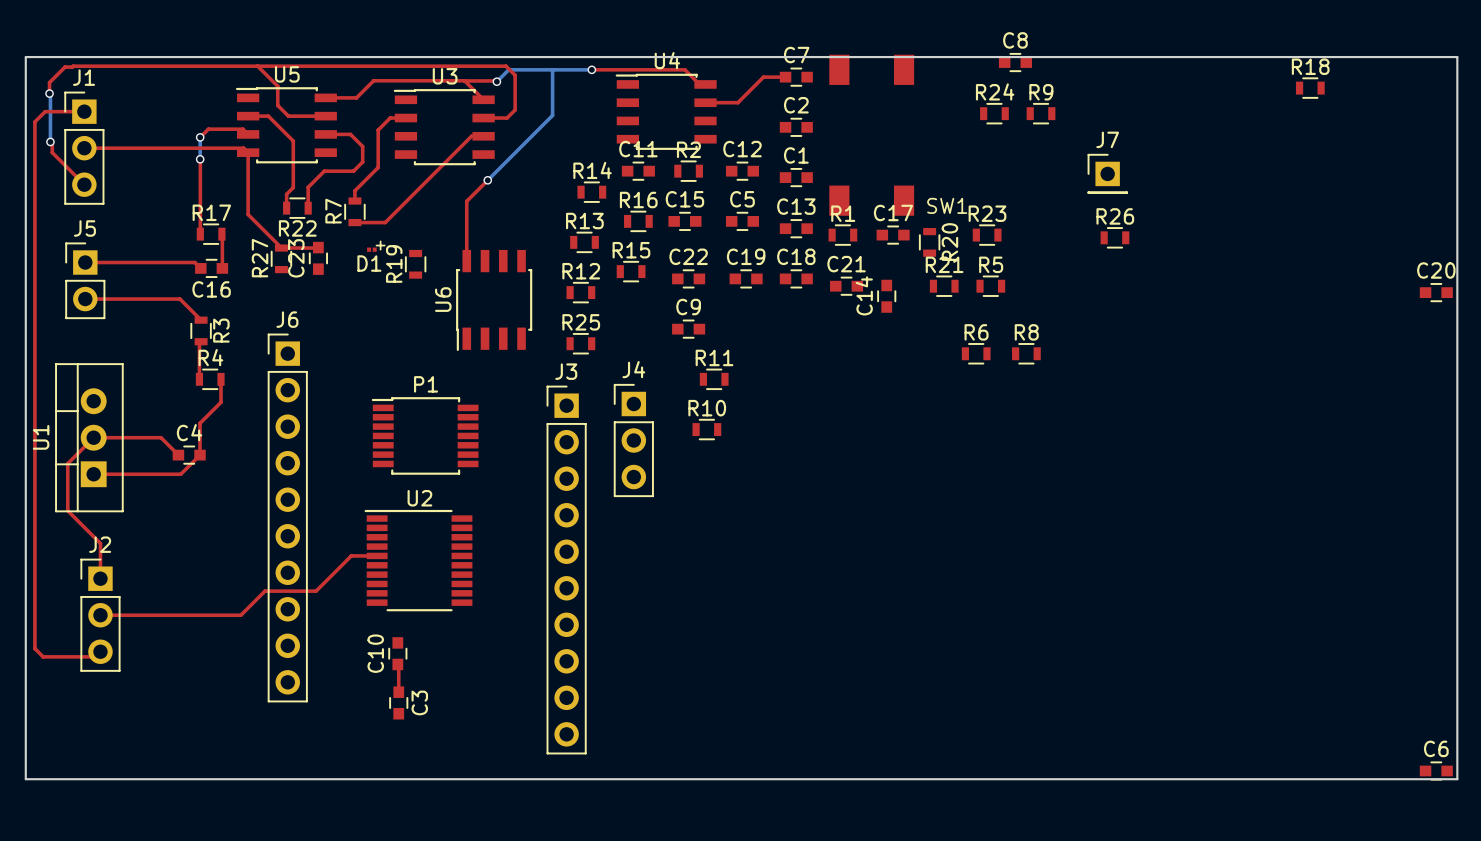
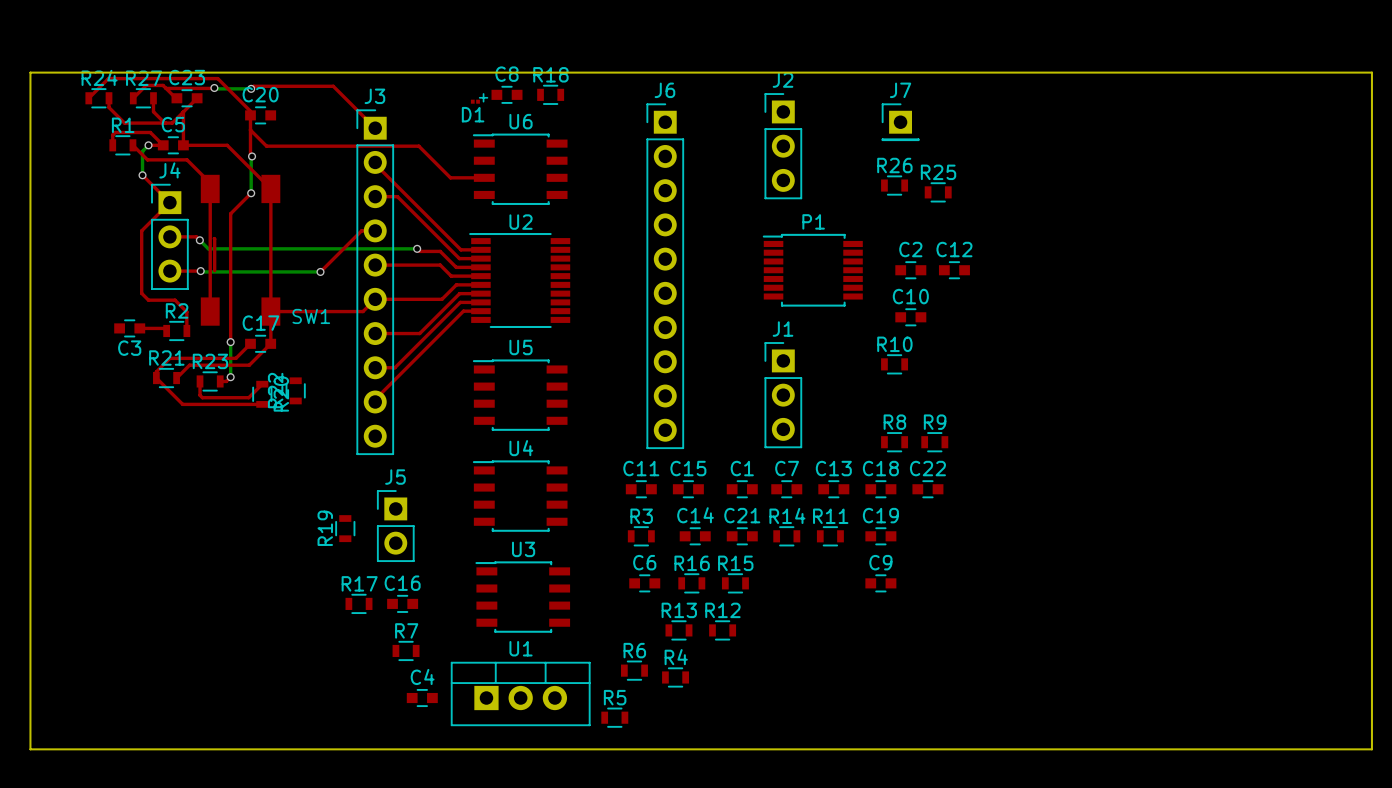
C8 position: (1015, 62) -> (507, 94)
top track: (257, 66) (277, 86) (277, 105) (288, 116) (325, 116) -> none
bottom track: (552, 69) (552, 115) (487, 180) -> none
top track: (591, 69) (684, 69) (699, 84) (705, 84) -> none
bottom track: (591, 69) (508, 69) (496, 81) -> none
via: (591, 69) -> none
top track: none -> (214, 88) (166, 88)
bottom track: none -> (214, 88) (251, 88)
via: none -> (214, 88)
top track: none -> (251, 88) (253, 86) (333, 86) (375, 128)
via: none -> (251, 88)
top track: (785, 77) (763, 77) (737, 102) (705, 102) -> none
C7 position: (796, 77) -> (786, 489)
top track: (464, 80) (496, 81) -> none
via: (496, 81) -> none
top track: none -> (88, 98) (108, 78) (217, 78) (250, 111) (252, 156)
top track: none -> (109, 98) (109, 107) (124, 123) (172, 123) (197, 98)
top track: none -> (133, 98) (146, 85) (163, 85) (176, 98)
top track: none -> (153, 98) (153, 111) (164, 123)
R18 position: (1310, 88) -> (550, 94)
top track: (49, 93) (49, 82) (65, 67) (73, 66) (506, 66) (515, 75) (515, 110) (507, 118) (483, 118) -> none
bottom track: (49, 93) (50, 141) -> none
via: (49, 93) -> none
top track: (325, 97) (356, 97) (373, 80) (464, 80) (483, 99) -> none
top track: none -> (183, 111) (183, 145) (227, 145) (270, 188) (270, 343) (249, 365) (189, 365) (176, 378)
top track: (84, 111) (45, 111) (34, 121) (34, 648) (43, 656) (95, 656) (100, 651) -> none
U4 position: (666, 111) -> (520, 496)
R24 position: (994, 113) -> (98, 98)
R9 position: (1041, 113) -> (934, 442)
top track: (248, 116) (268, 116) (293, 141) (293, 187) (286, 194) (286, 208) -> none
top track: none -> (250, 130) (266, 146) (418, 146) (450, 177) (484, 177)
top track: (405, 118) (390, 118) (378, 130) (378, 167) (354, 190) (354, 201) -> none
U5 position: (286, 125) -> (520, 395)
U3 position: (444, 127) -> (522, 597)
C2 position: (796, 127) -> (910, 270)
top track: none -> (112, 145) (112, 134) (115, 132) (150, 132) (163, 145) (148, 145)
top track: none -> (132, 145) (147, 159) (187, 159) (210, 183) (210, 311)
bottom track: none -> (148, 145) (142, 151) (142, 175)
via: none -> (148, 145)
top track: (248, 134) (242, 129) (208, 129) (200, 137) -> none
top track: (325, 134) (350, 134) (362, 146) (362, 162) (353, 171) (324, 171) (308, 187) (308, 208) -> none
SW1 position: (871, 135) -> (240, 250)
top track: (483, 136) (471, 136) (385, 222) (354, 222) -> none
bottom track: (200, 137) (200, 159) -> none
via: (200, 137) -> none
top track: (50, 141) (52, 152) (84, 184) -> none
via: (50, 141) -> none
bottom track: none -> (252, 156) (251, 193)
via: none -> (252, 156)
top track: (84, 148) (243, 148) (248, 152) (248, 214) (281, 247) -> none
J1 position: (84, 148) -> (783, 395)
top track: none -> (375, 162) (460, 249) (480, 249)
top track: (200, 159) (200, 234) -> none
via: (200, 159) -> none
top track: none -> (142, 175) (169, 202) (141, 230) (141, 293) (148, 300) (175, 300) (186, 311) (186, 330)
via: none -> (142, 175)
C11 position: (638, 171) -> (641, 489)
R2 position: (688, 171) -> (176, 330)
C12 position: (742, 171) -> (954, 270)
J7 position: (1107, 173) -> (900, 122)
C1 position: (796, 177) -> (742, 489)
top track: (487, 180) (466, 201) (466, 261) -> none
via position: (487, 180) -> (417, 248)
top track: none -> (251, 193) (230, 213) (230, 342)
via: none -> (251, 193)
top track: none -> (375, 196) (397, 196) (459, 258) (480, 258)
R14 position: (591, 192) -> (786, 536)
R22 rotation: 0° (297, 208) -> 90° clockwise (295, 390)
R22 position: (297, 208) -> (295, 390)
R7 rotation: 0° (354, 211) -> 90° clockwise (406, 650)
R7 position: (354, 211) -> (406, 650)
R16 position: (638, 221) -> (691, 583)
C15 position: (684, 221) -> (688, 489)
C5 position: (742, 221) -> (173, 145)
top track: none -> (375, 230) (361, 230) (320, 271)
C13 position: (796, 228) -> (833, 489)
top track: none -> (169, 236) (196, 236) (199, 240)
R17 position: (211, 234) -> (358, 603)
bottom track: none -> (199, 240) (208, 248) (417, 248)
via: none -> (199, 240)
R1 position: (842, 235) -> (122, 145)
C17 position: (893, 235) -> (260, 343)
R23 position: (987, 235) -> (210, 381)
R26 position: (1114, 237) -> (894, 185)
R13 position: (584, 242) -> (678, 630)
R20 position: (929, 242) -> (262, 394)
top track: none -> (417, 248) (419, 251) (440, 251) (456, 267) (480, 267)
top track: (318, 247) (281, 248) -> none
D1 position: (371, 249) -> (475, 101)
R27 rotation: 0° (281, 258) -> 90° clockwise (143, 98)
R27 position: (281, 258) -> (143, 98)
C23 rotation: 0° (318, 258) -> 90° clockwise (187, 98)
C23 position: (318, 258) -> (187, 98)
top track: (85, 262) (194, 262) (200, 268) -> none
top track: none -> (375, 265) (440, 265) (451, 276) (480, 276)
R19 position: (415, 264) -> (345, 528)
top track: none -> (169, 271) (200, 271)
bottom track: none -> (200, 271) (320, 271)
via: none -> (200, 271)
C16 position: (211, 268) -> (402, 603)
via: none -> (320, 271)
R15 position: (631, 271) -> (735, 583)
C22 position: (688, 278) -> (927, 489)
C19 position: (746, 278) -> (880, 536)
C18 position: (796, 278) -> (880, 489)
J5 position: (85, 280) -> (395, 526)
top track: none -> (480, 284) (456, 284) (441, 299) (375, 299) (363, 311) (270, 311)
C21 position: (846, 286) -> (742, 536)
R21 position: (944, 286) -> (166, 378)
R5 position: (990, 286) -> (614, 717)
C16 name position: C16 (211, 289) -> C16 (402, 583)
top track: none -> (480, 293) (459, 293) (419, 333) (375, 333)
R12 position: (580, 292) -> (722, 630)
C20 position: (1436, 292) -> (260, 115)
C14 rotation: 0° (886, 296) -> 90° clockwise (695, 536)
C14 position: (886, 296) -> (695, 536)
top track: (85, 299) (179, 299) (201, 320) -> none
U6 rotation: 0° (494, 300) -> 90° clockwise (520, 169)
U6 position: (494, 300) -> (520, 169)
top track: none -> (480, 302) (460, 302) (394, 367) (375, 367)
top track: none -> (480, 311) (463, 311) (375, 399) (375, 401)
C9 position: (688, 329) -> (880, 583)
top track: none -> (139, 328) (164, 328) (166, 330)
R3 rotation: 0° (201, 330) -> 90° clockwise (641, 536)
R3 position: (201, 330) -> (641, 536)
R3 name position: R3 (221, 330) -> R3 (641, 516)
top track: (201, 341) (199, 343) (199, 379) -> none
R25 position: (580, 343) -> (938, 192)
bottom track: none -> (230, 342) (230, 377)
via: none -> (230, 342)
top track: none -> (250, 343) (235, 358) (169, 358) (156, 371) (156, 378) (182, 404) (262, 404)
R6 position: (976, 353) -> (634, 670)
R8 position: (1026, 353) -> (894, 442)
R4 position: (210, 379) -> (675, 677)
top track: (221, 379) (221, 402) (200, 423) (200, 455) (180, 474) (93, 474) -> none
R11 position: (714, 379) -> (830, 536)
top track: none -> (230, 377) (226, 381) (220, 381)
via: none -> (230, 377)
top track: none -> (200, 381) (200, 395) (202, 397) (248, 397) (262, 384)
R10 position: (706, 429) -> (894, 364)
P1 position: (425, 435) -> (812, 270)
U1 rotation: 0° (89, 437) -> 90° clockwise (520, 693)
U1 position: (89, 437) -> (520, 693)
J4 position: (633, 440) -> (169, 236)
top track: (178, 455) (161, 437) (93, 437) (67, 463) (67, 510) (100, 543) (100, 578) -> none
C4 position: (189, 455) -> (422, 698)
J6 position: (287, 517) -> (665, 276)
top track: (377, 555) (351, 555) (316, 591) (265, 591) (240, 615) (100, 615) -> none
U2 position: (418, 560) -> (519, 280)
J3 position: (566, 570) -> (375, 282)
J2 position: (100, 615) -> (783, 146)
C10 rotation: 0° (397, 653) -> 90° clockwise (910, 317)
C10 position: (397, 653) -> (910, 317)
top track: (397, 664) (398, 692) -> none
C3 rotation: 0° (398, 702) -> 90° clockwise (129, 328)
C3 position: (398, 702) -> (129, 328)
C6 position: (1436, 770) -> (644, 583)

